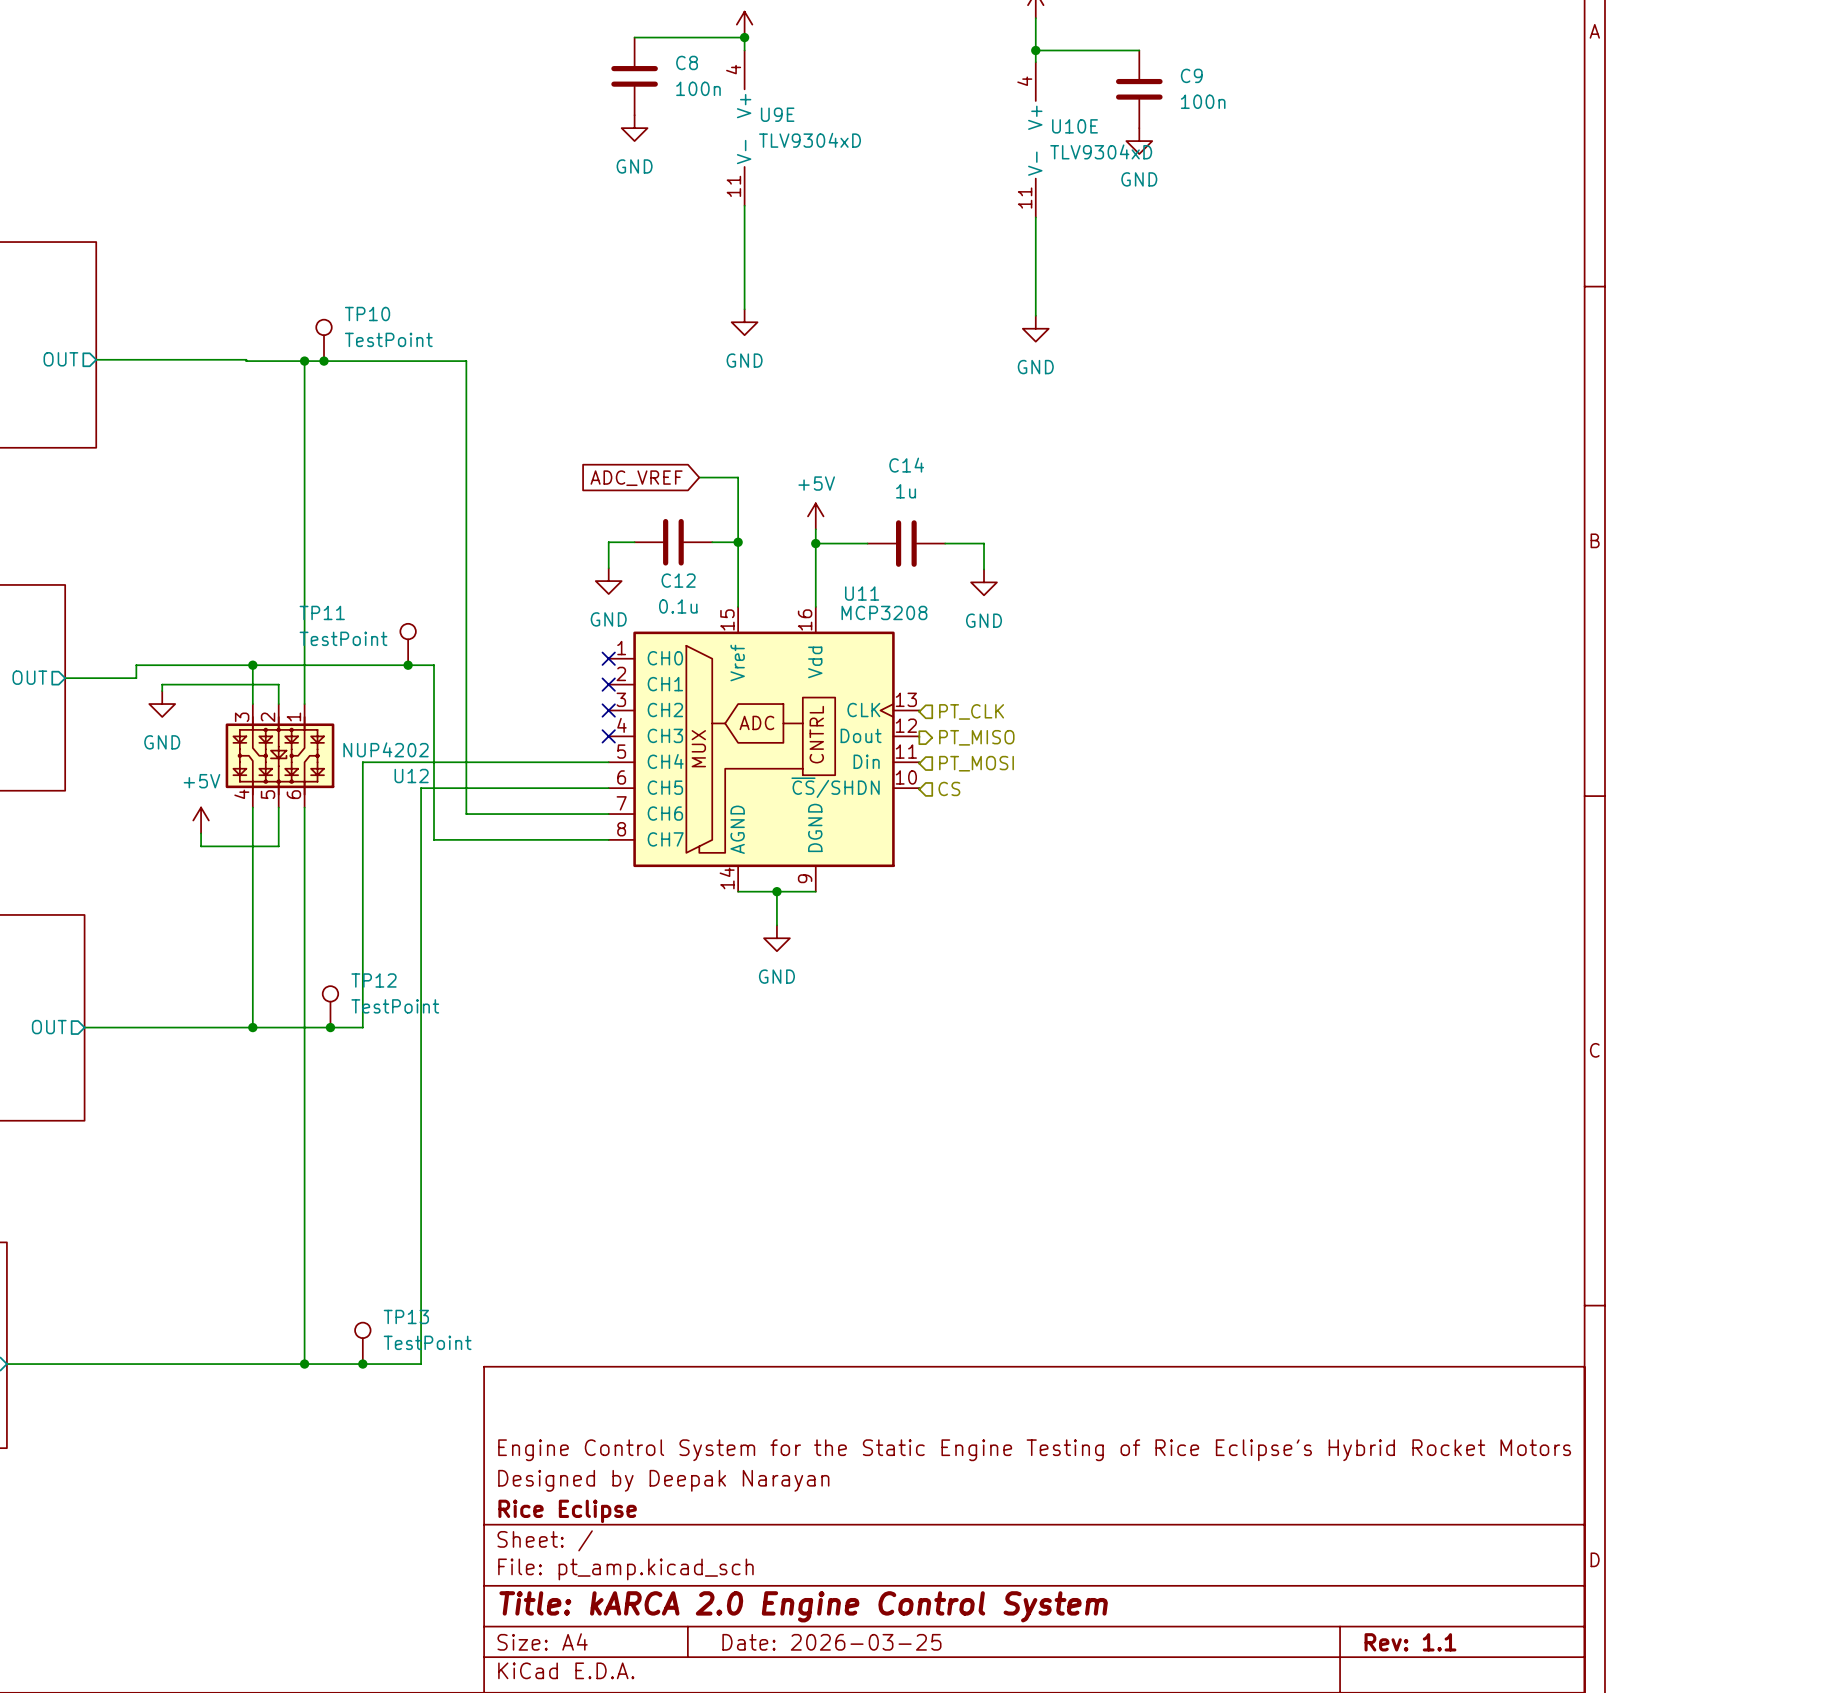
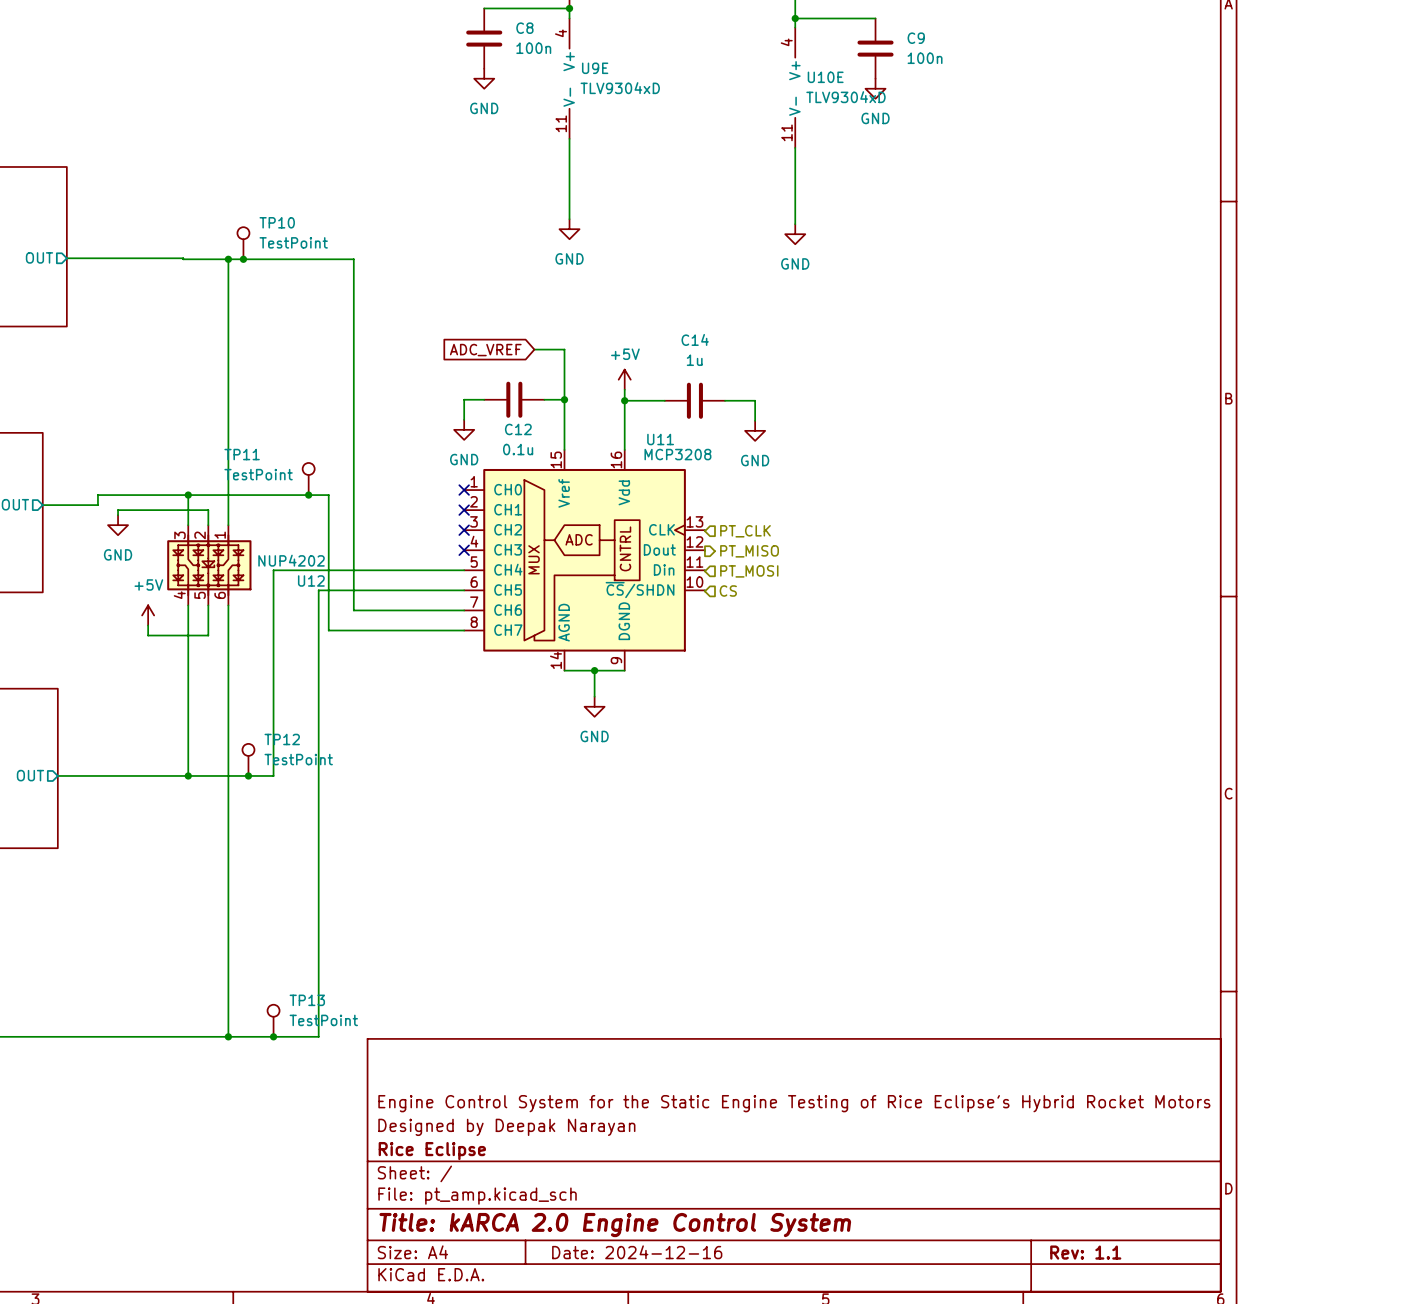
title block: Date: 2026-03-25 (831, 1642) -> Date: 2024-12-16 (637, 1252)

